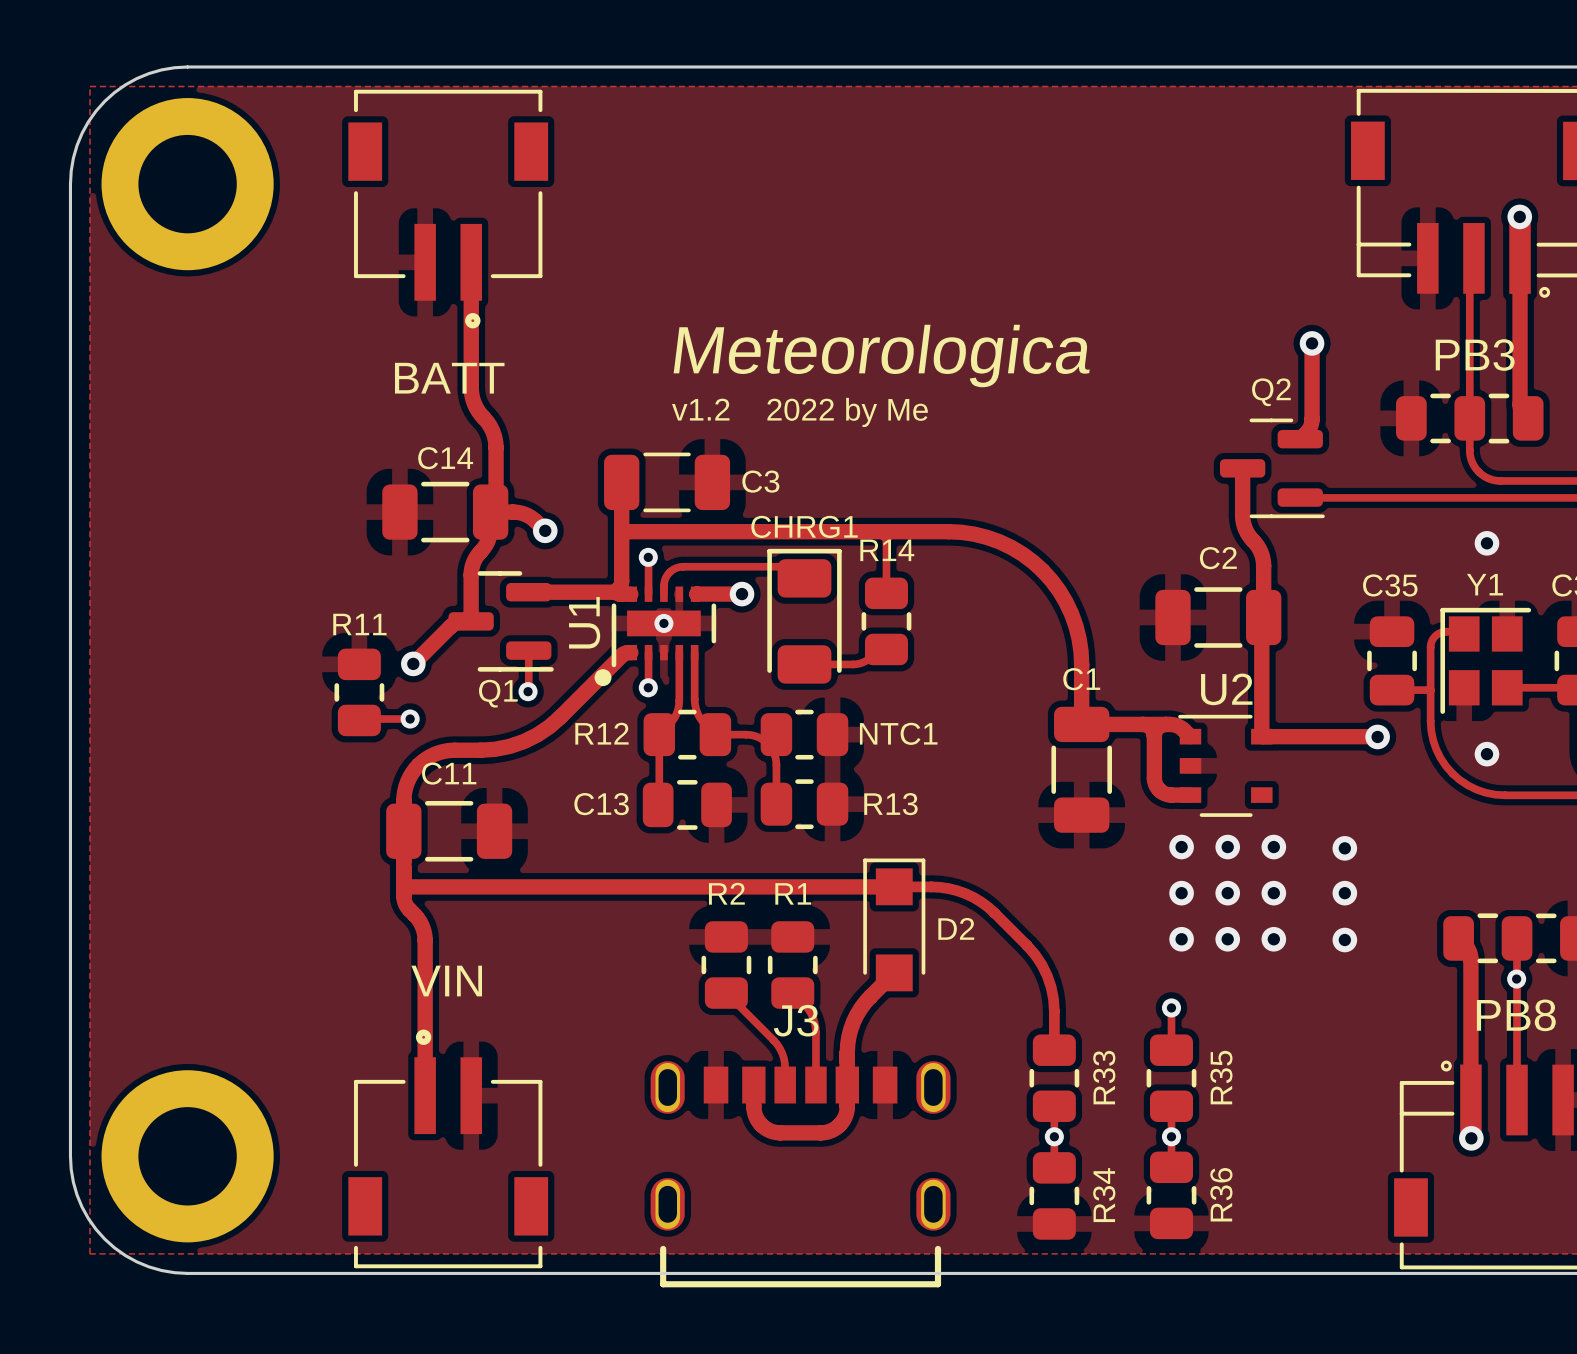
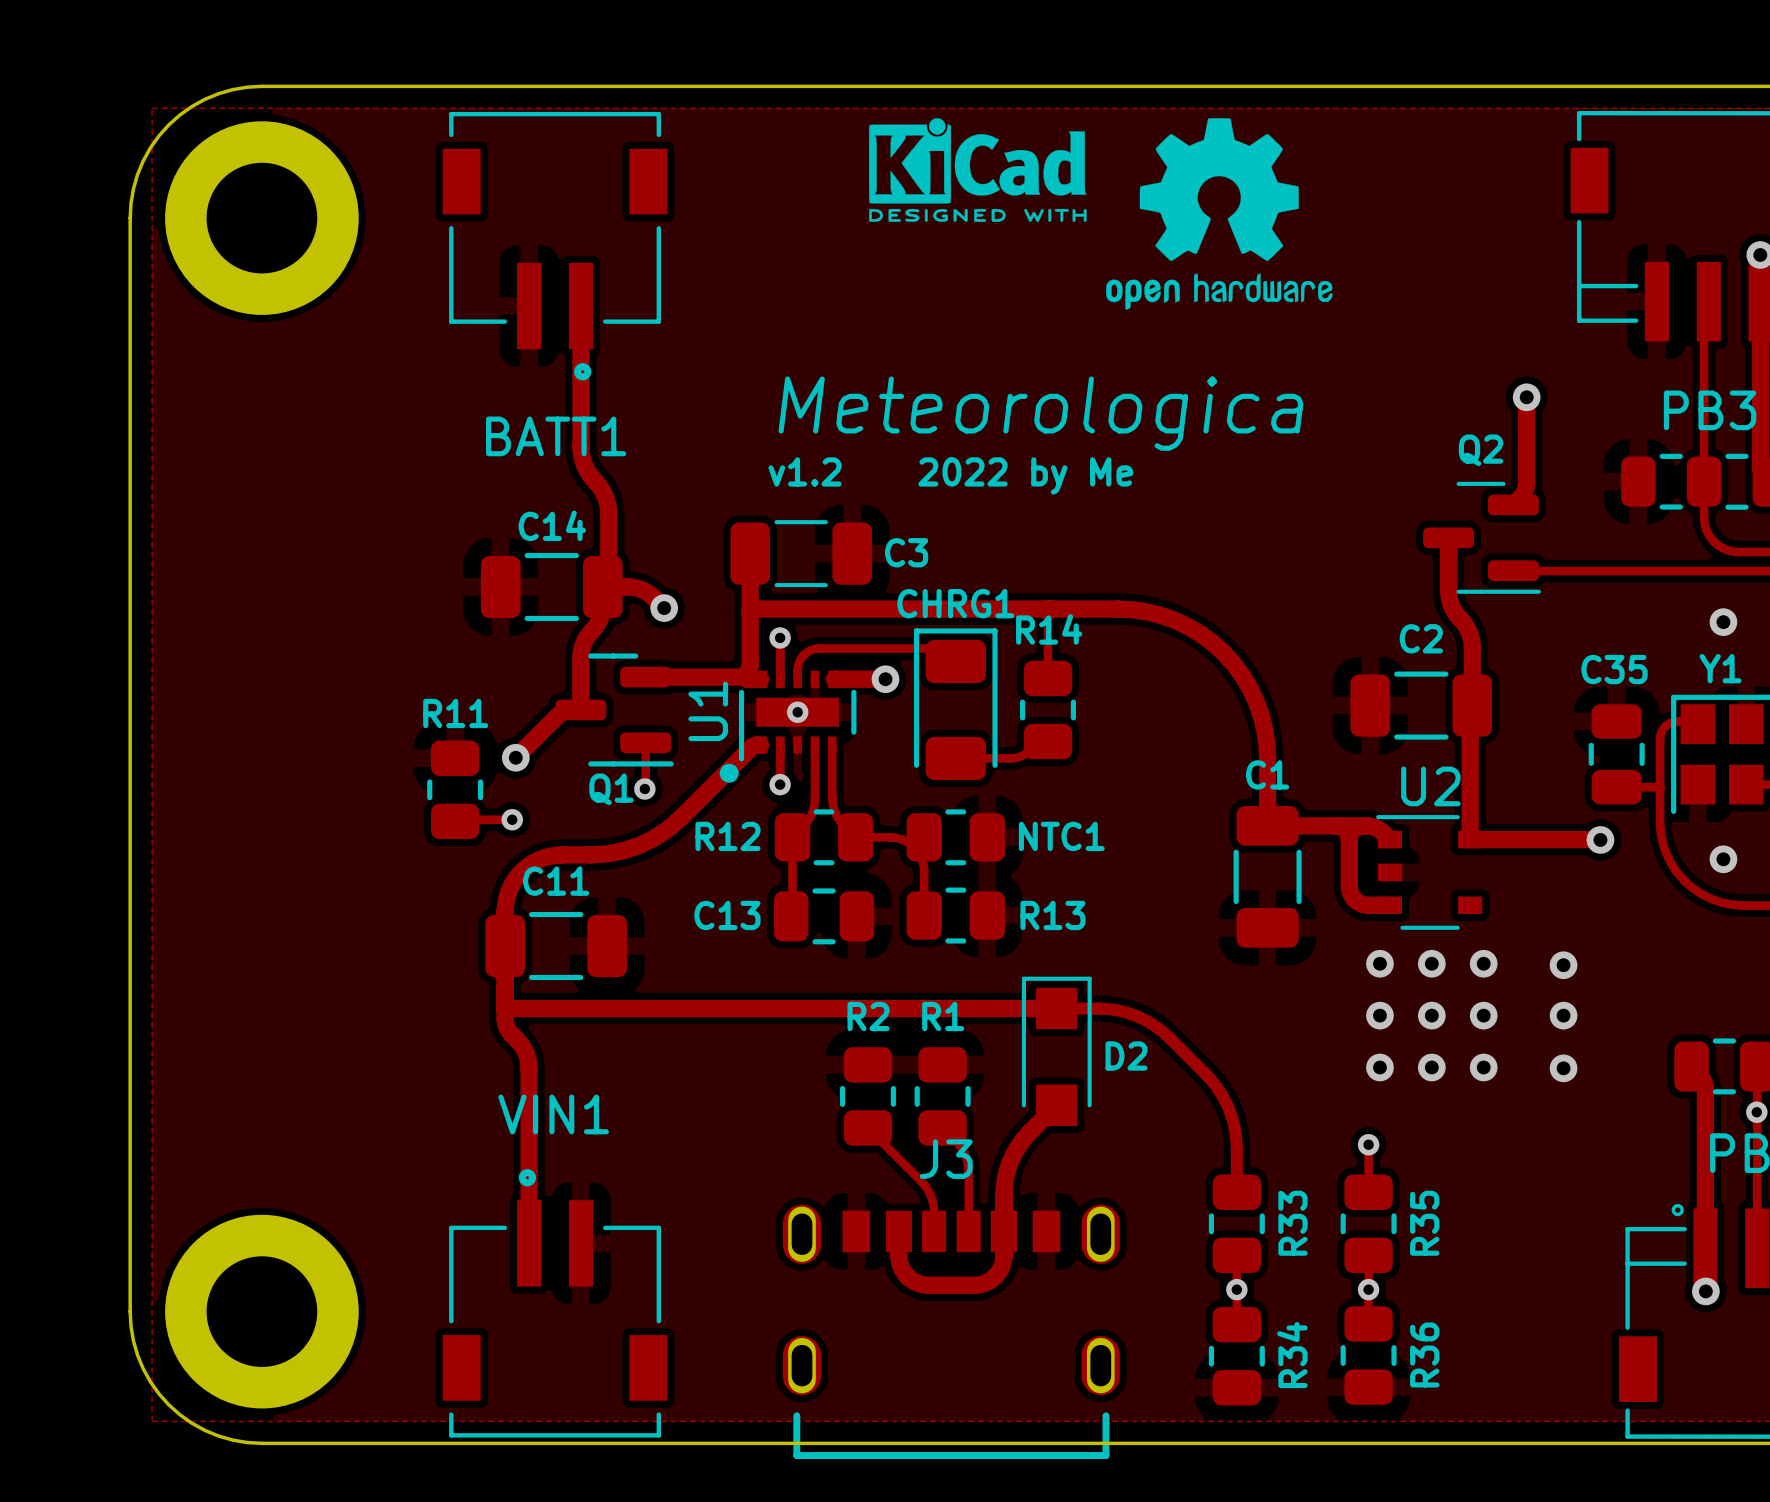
drawing: none -> [869, 118, 1333, 310]
BATT name: BATT (449, 378) -> BATT1 (556, 436)
VIN name: VIN (446, 981) -> VIN1 (553, 1114)

